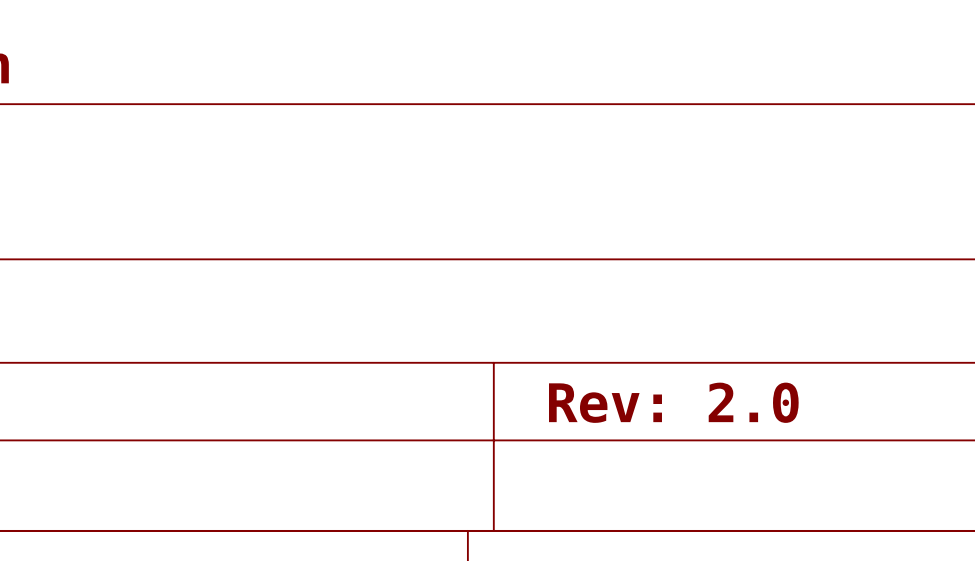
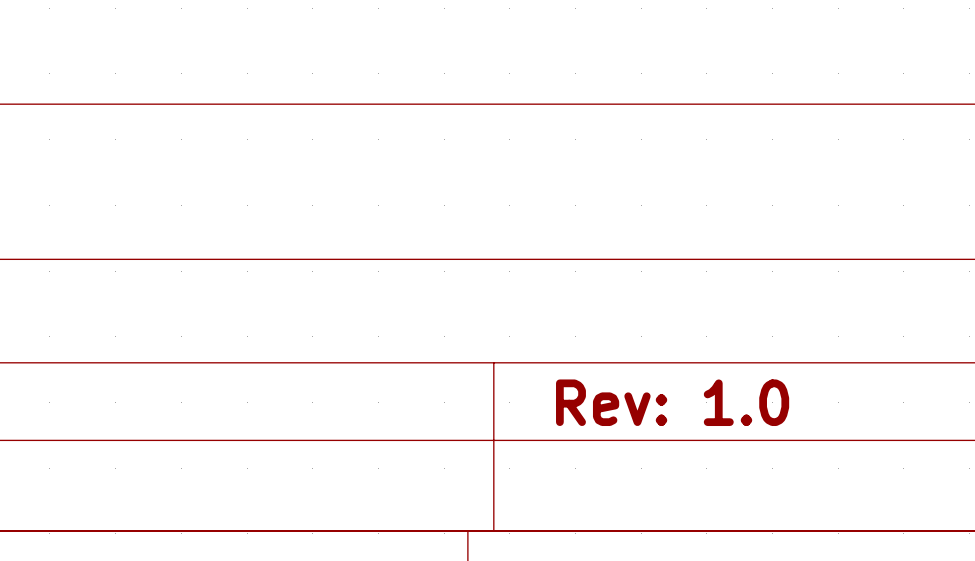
title block: Rev: 2.0 (673, 402) -> Rev: 1.0 (672, 402)

